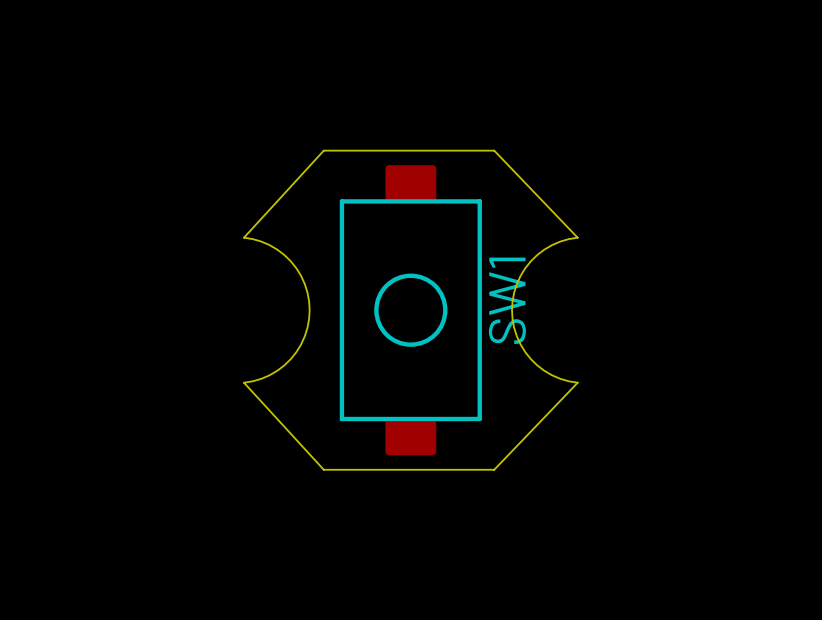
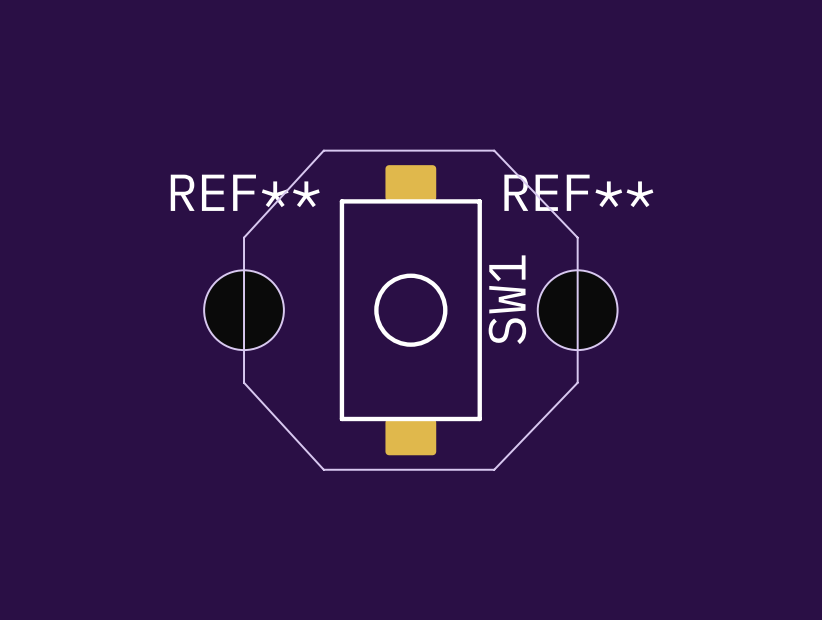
board edge: (244, 237) (269, 245) (290, 261) (304, 283) (309, 310) (304, 336) (290, 359) (269, 375) (244, 382) -> (244, 237) (244, 382)
board edge: (577, 237) (552, 245) (530, 261) (516, 284) (512, 310) (516, 336) (530, 359) (552, 375) (577, 382) -> (577, 237) (577, 382)
REF**: none -> (244, 310)
REF**: none -> (577, 310)

